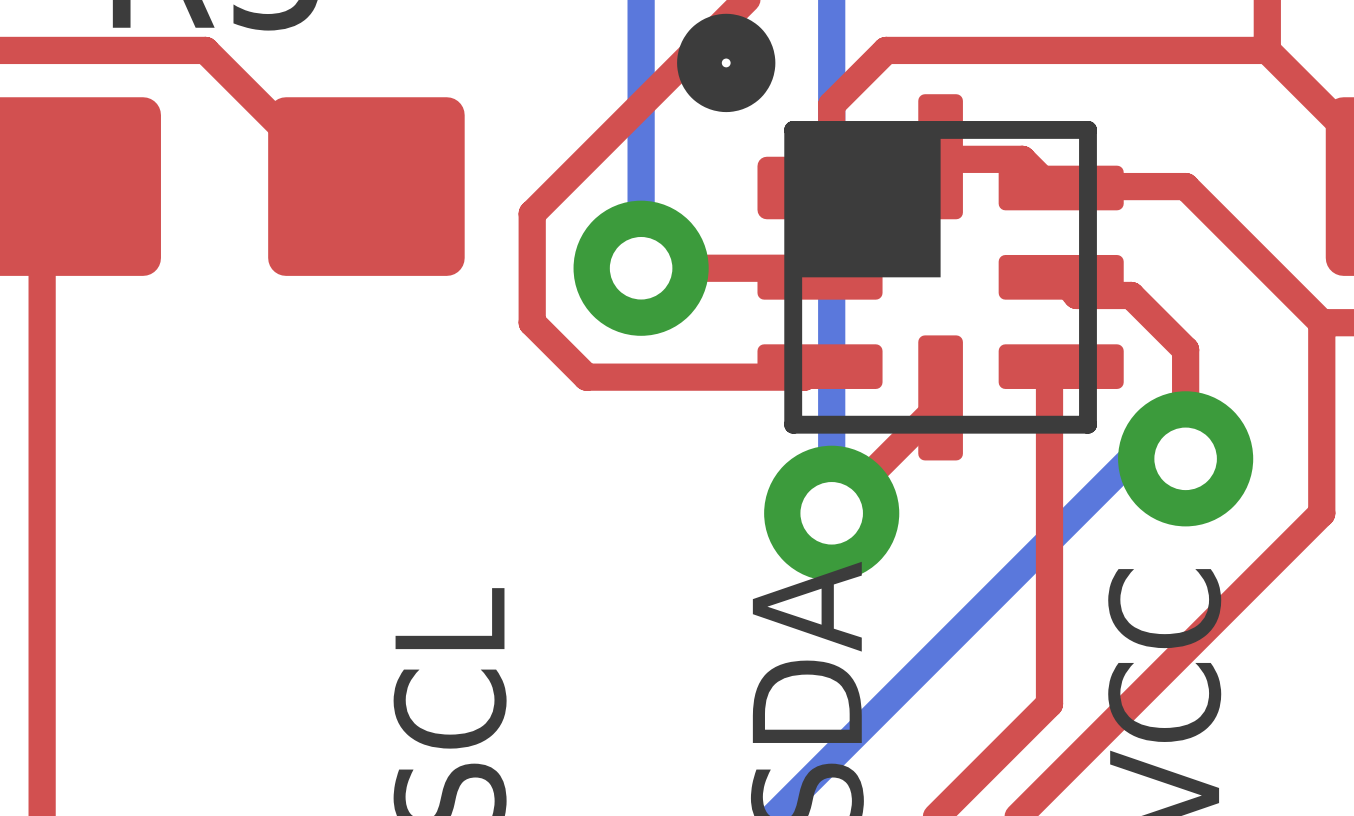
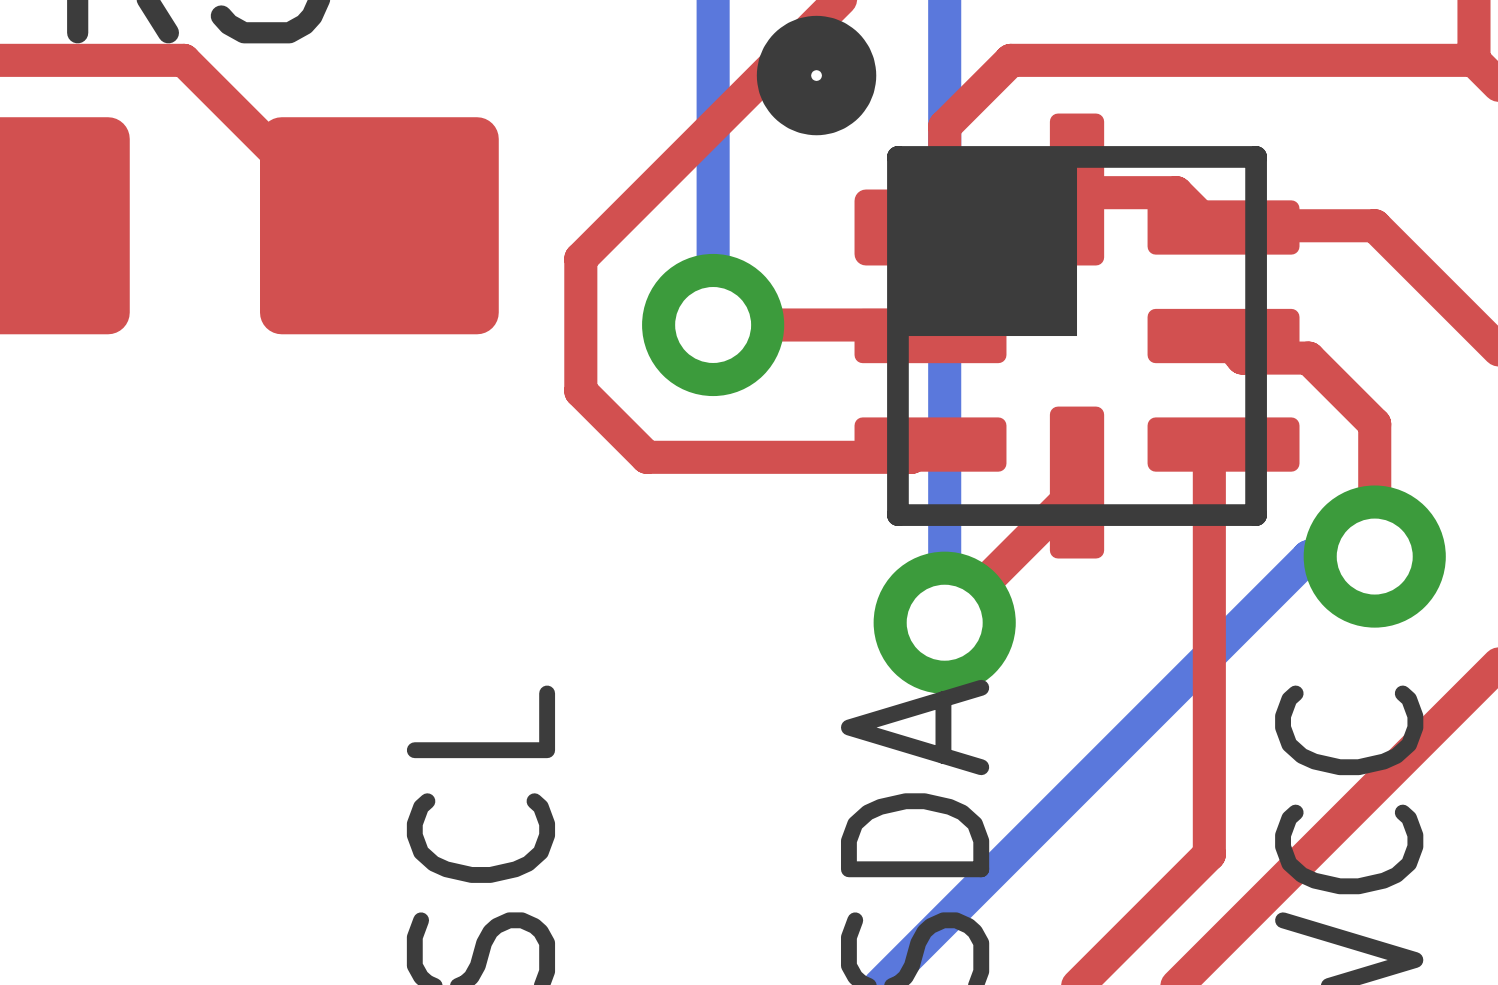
via size: [573, 200, 709, 336] -> [642, 253, 785, 397]
via size: [1118, 391, 1254, 527] -> [1303, 485, 1446, 628]
via size: [764, 445, 900, 581] -> [873, 551, 1016, 694]

